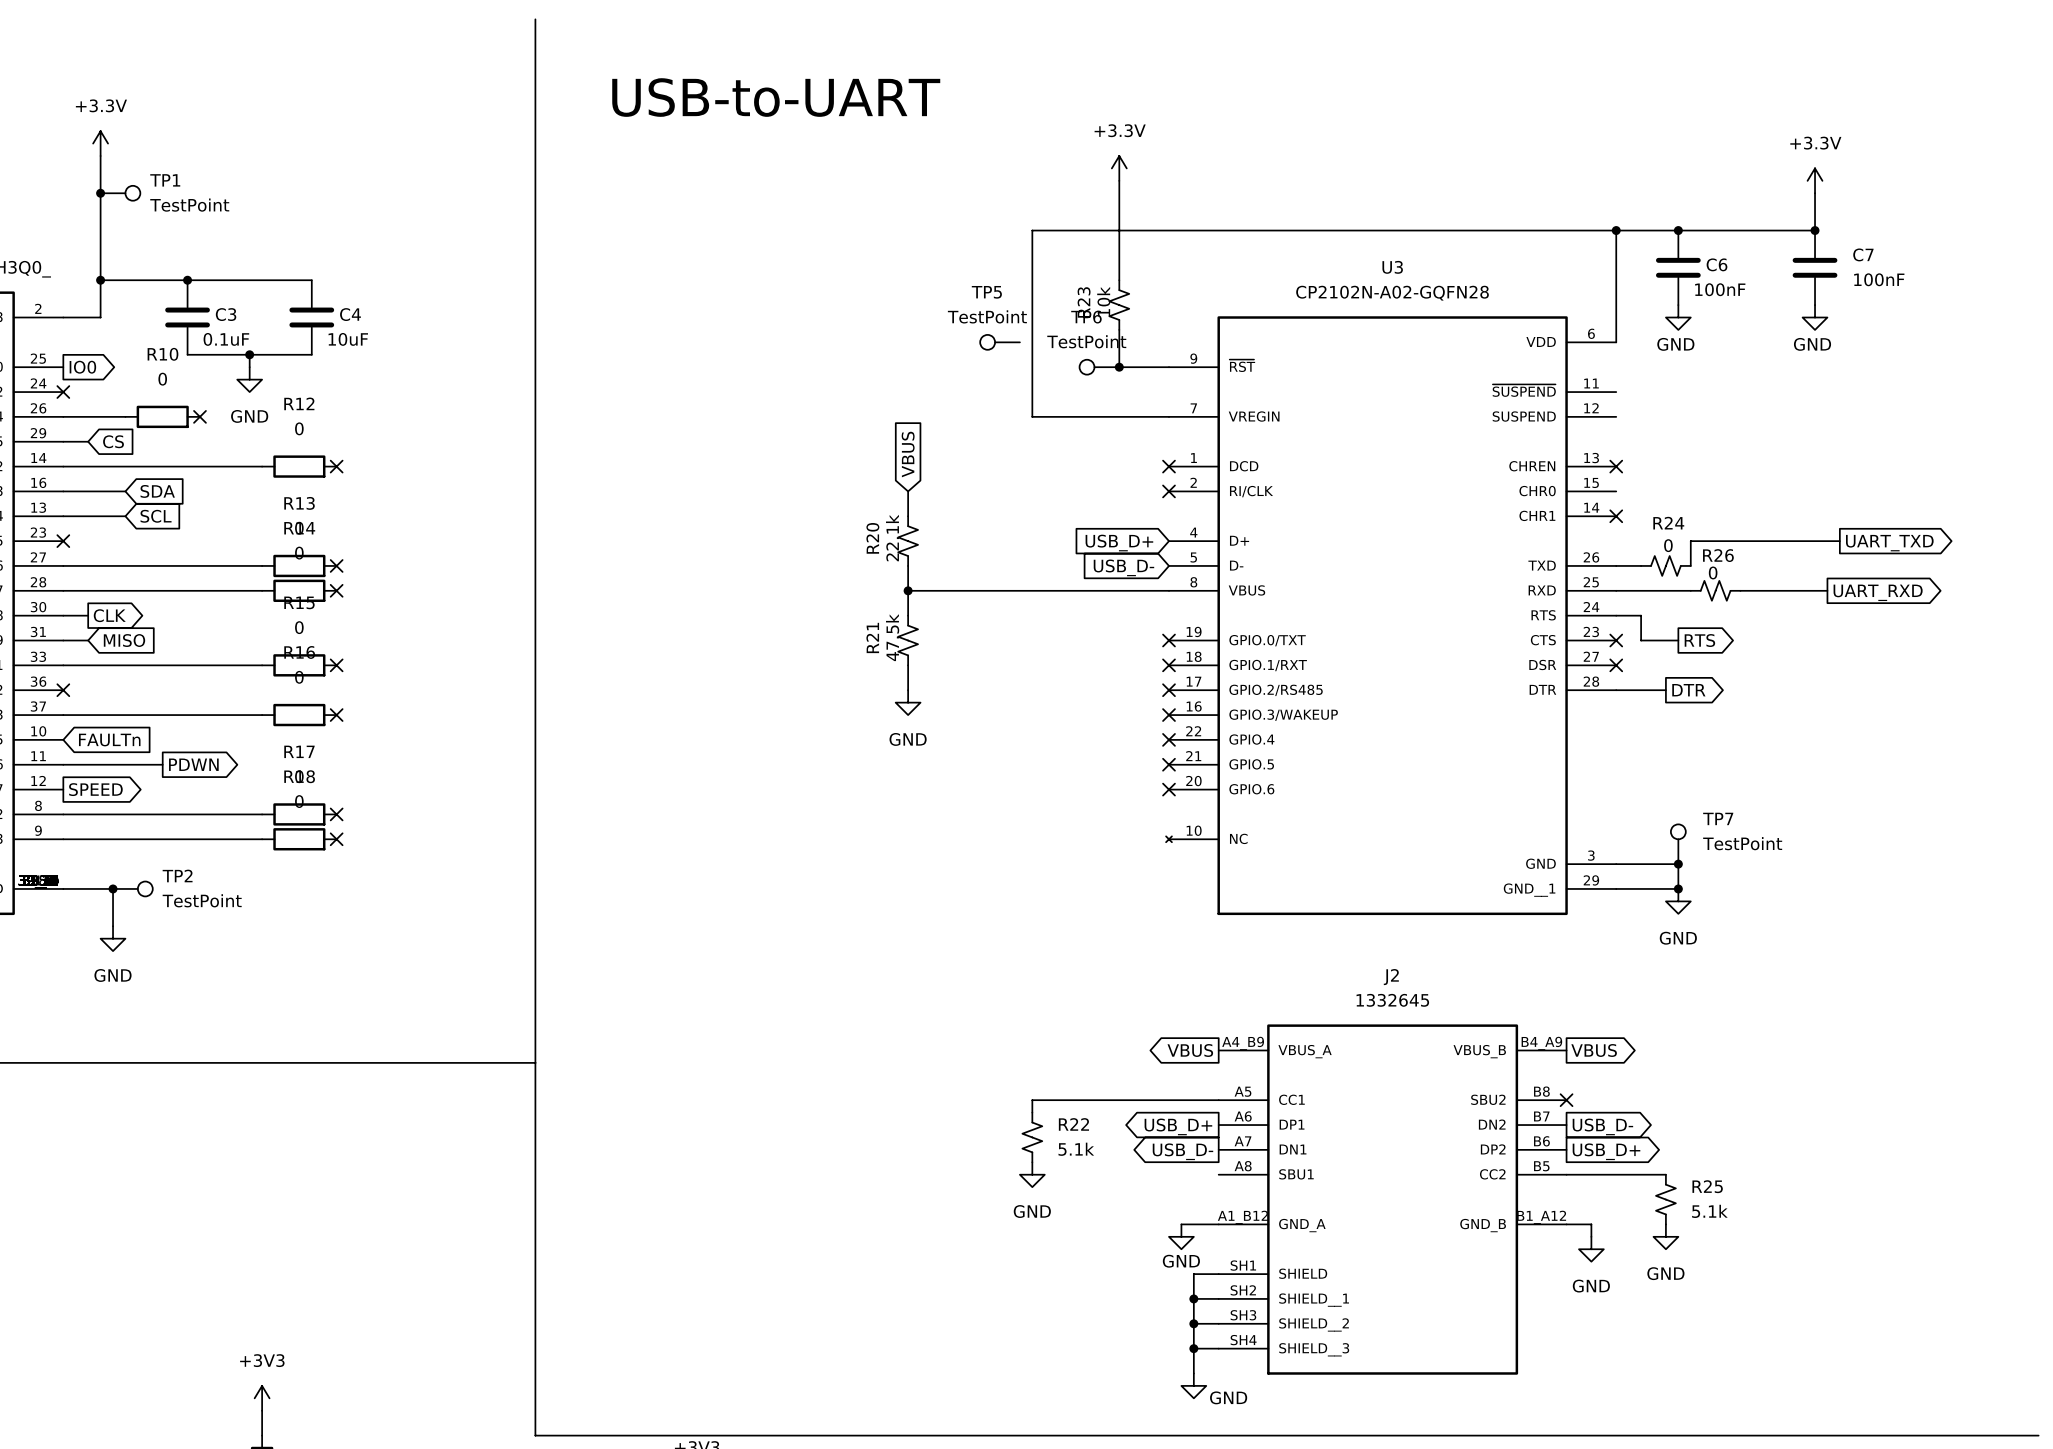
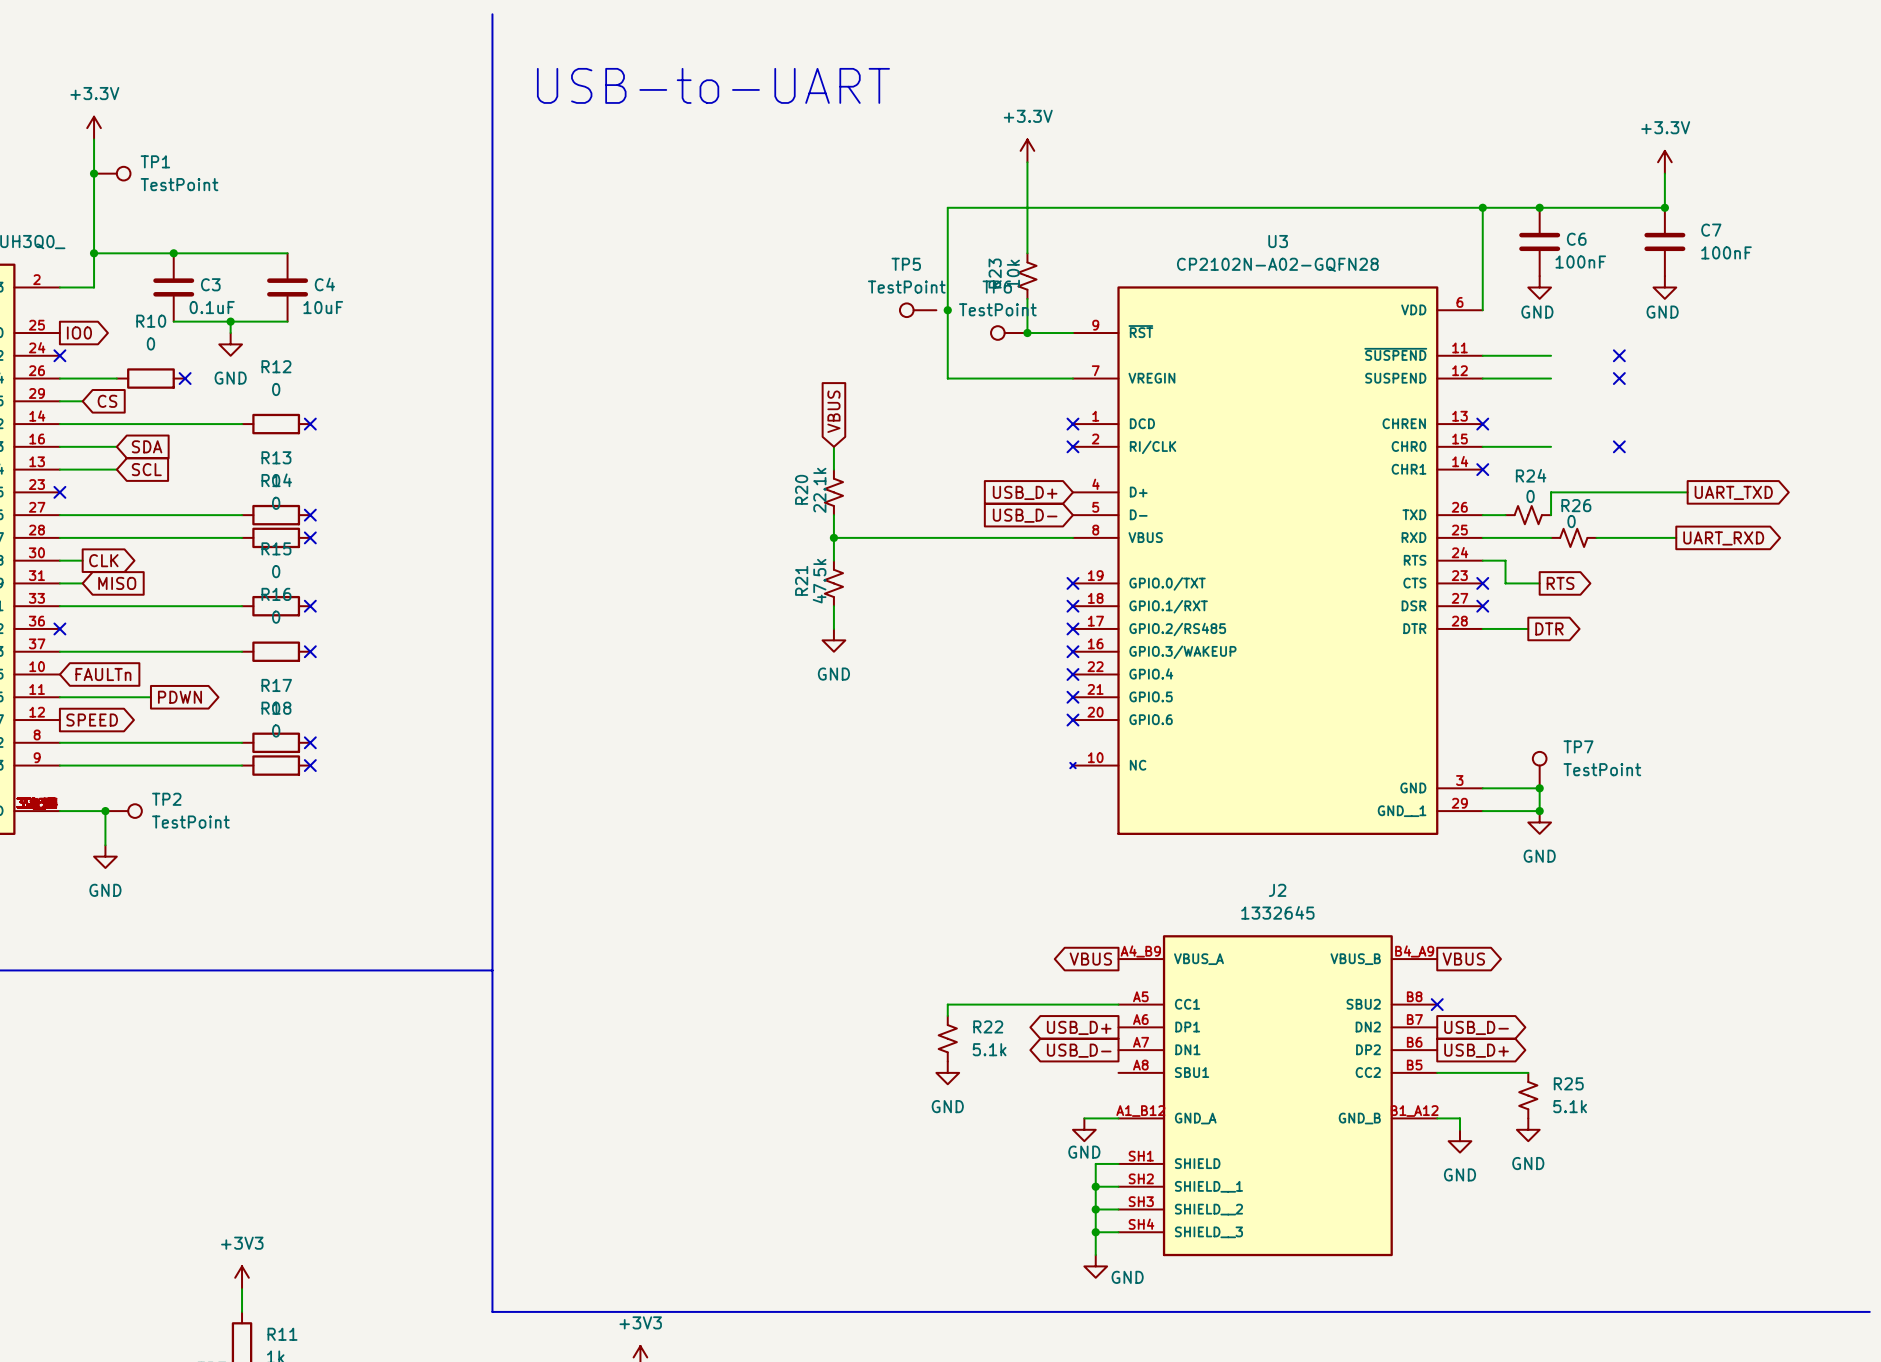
junction: none -> (947, 310)
wire: none -> (1482, 355) (1551, 355)
no-connect mark: none -> (1619, 355)
wire: none -> (1482, 378) (1551, 378)
no-connect mark: none -> (1619, 378)
wire: none -> (1482, 446) (1551, 446)
no-connect mark: none -> (1619, 446)

